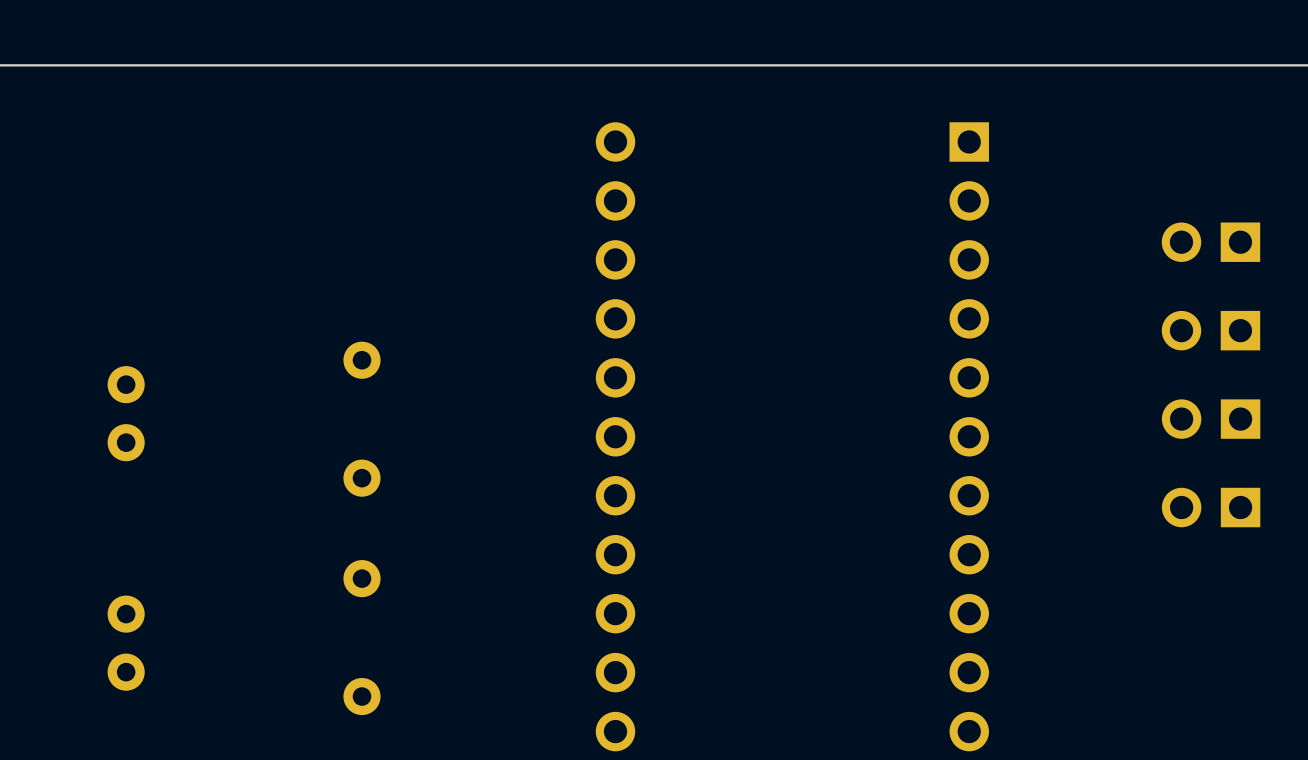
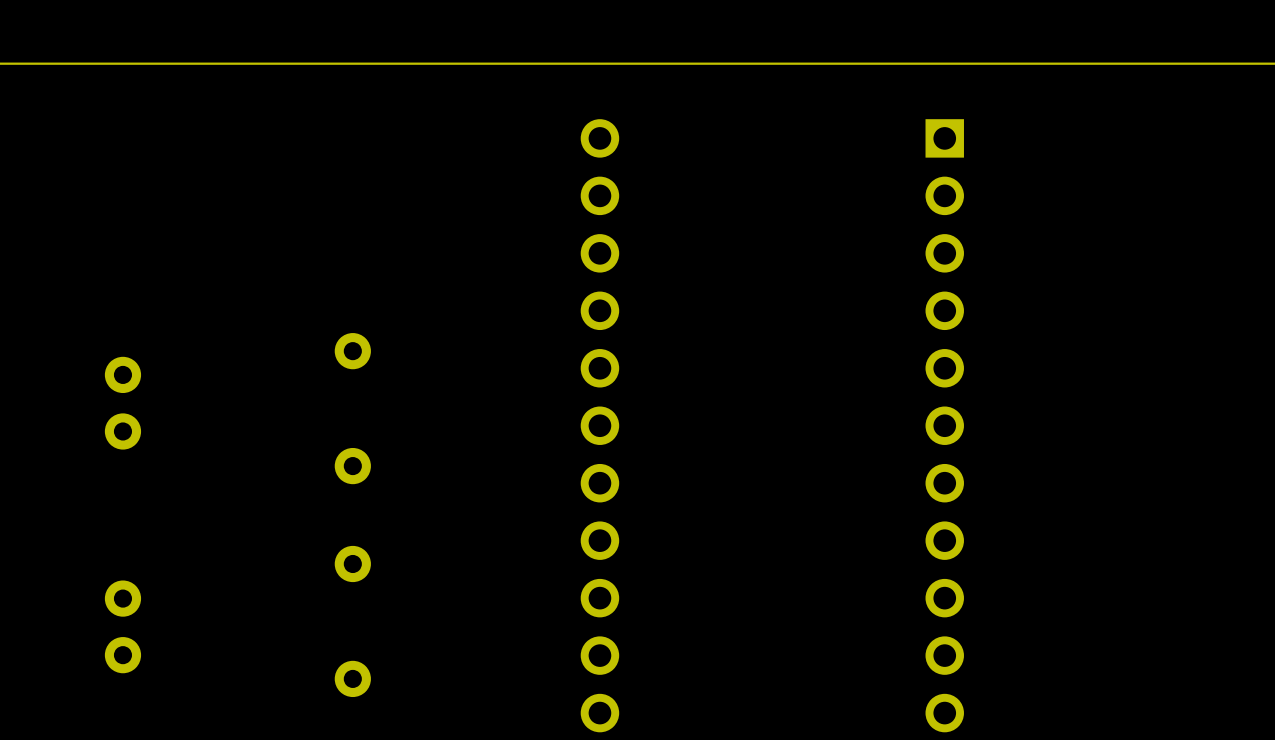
part: (1210, 242) -> none
part: (1210, 330) -> none
part: (1211, 419) -> none
part: (1211, 507) -> none

